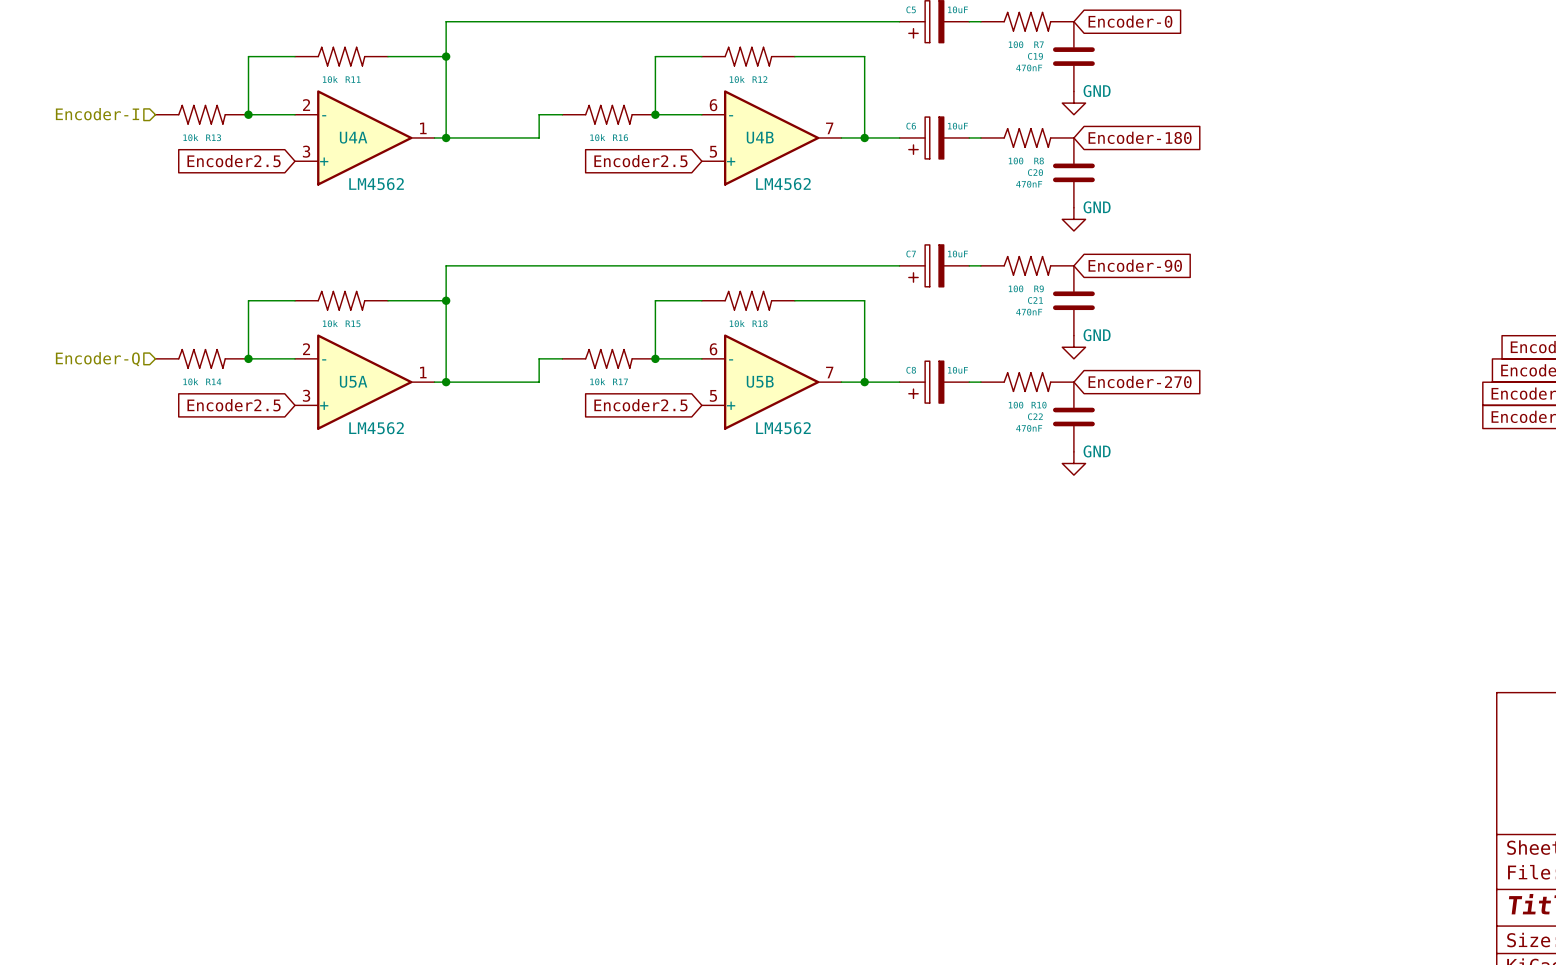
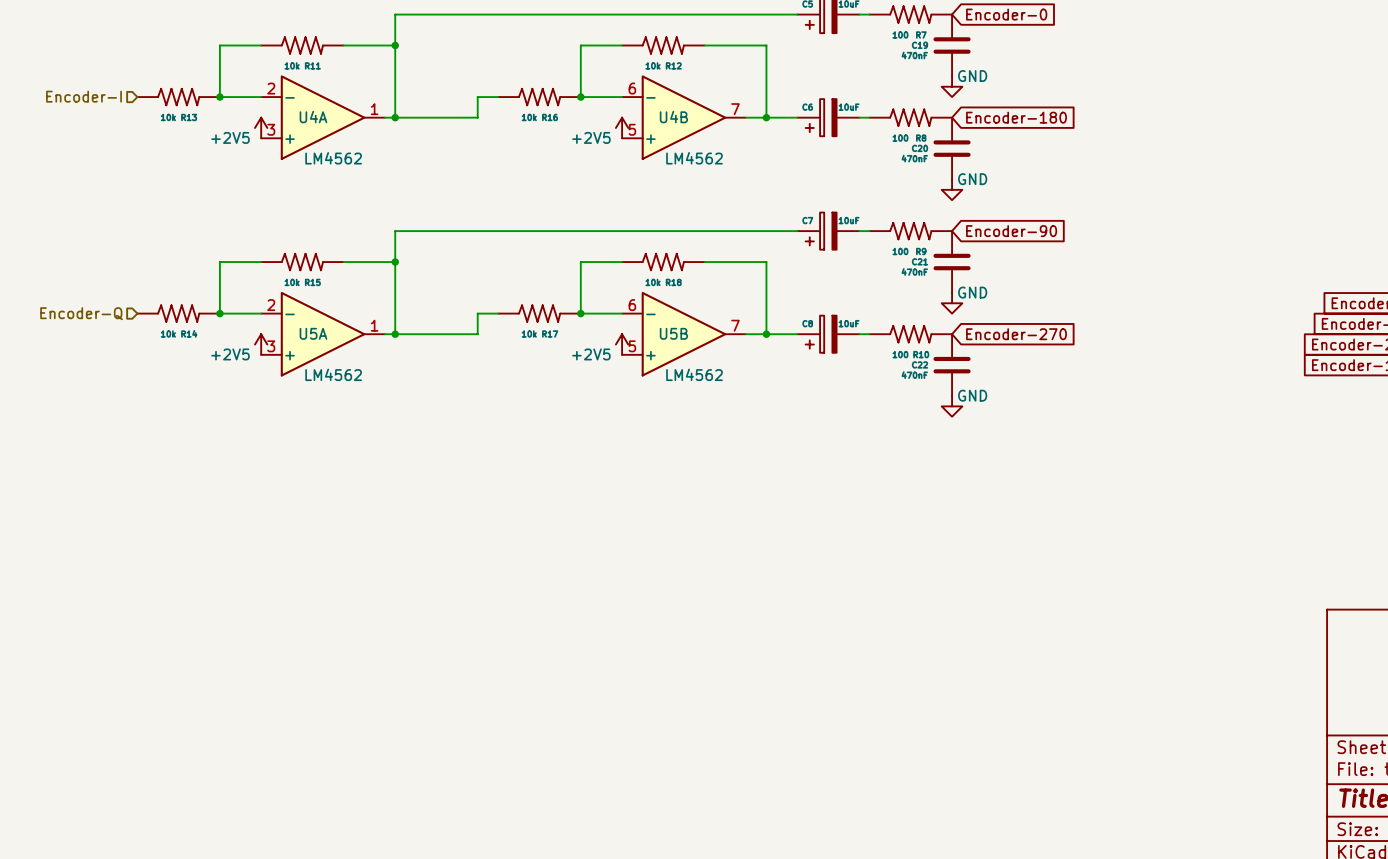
power symbol: none -> +2V5 (261, 127)
power symbol: none -> +2V5 (622, 127)
global label: Encoder2.5 (234, 161) -> none
global label: Encoder2.5 (640, 161) -> none
power symbol: none -> +2V5 (261, 344)
power symbol: none -> +2V5 (622, 344)
global label: Encoder2.5 (234, 405) -> none
global label: Encoder2.5 (640, 405) -> none

